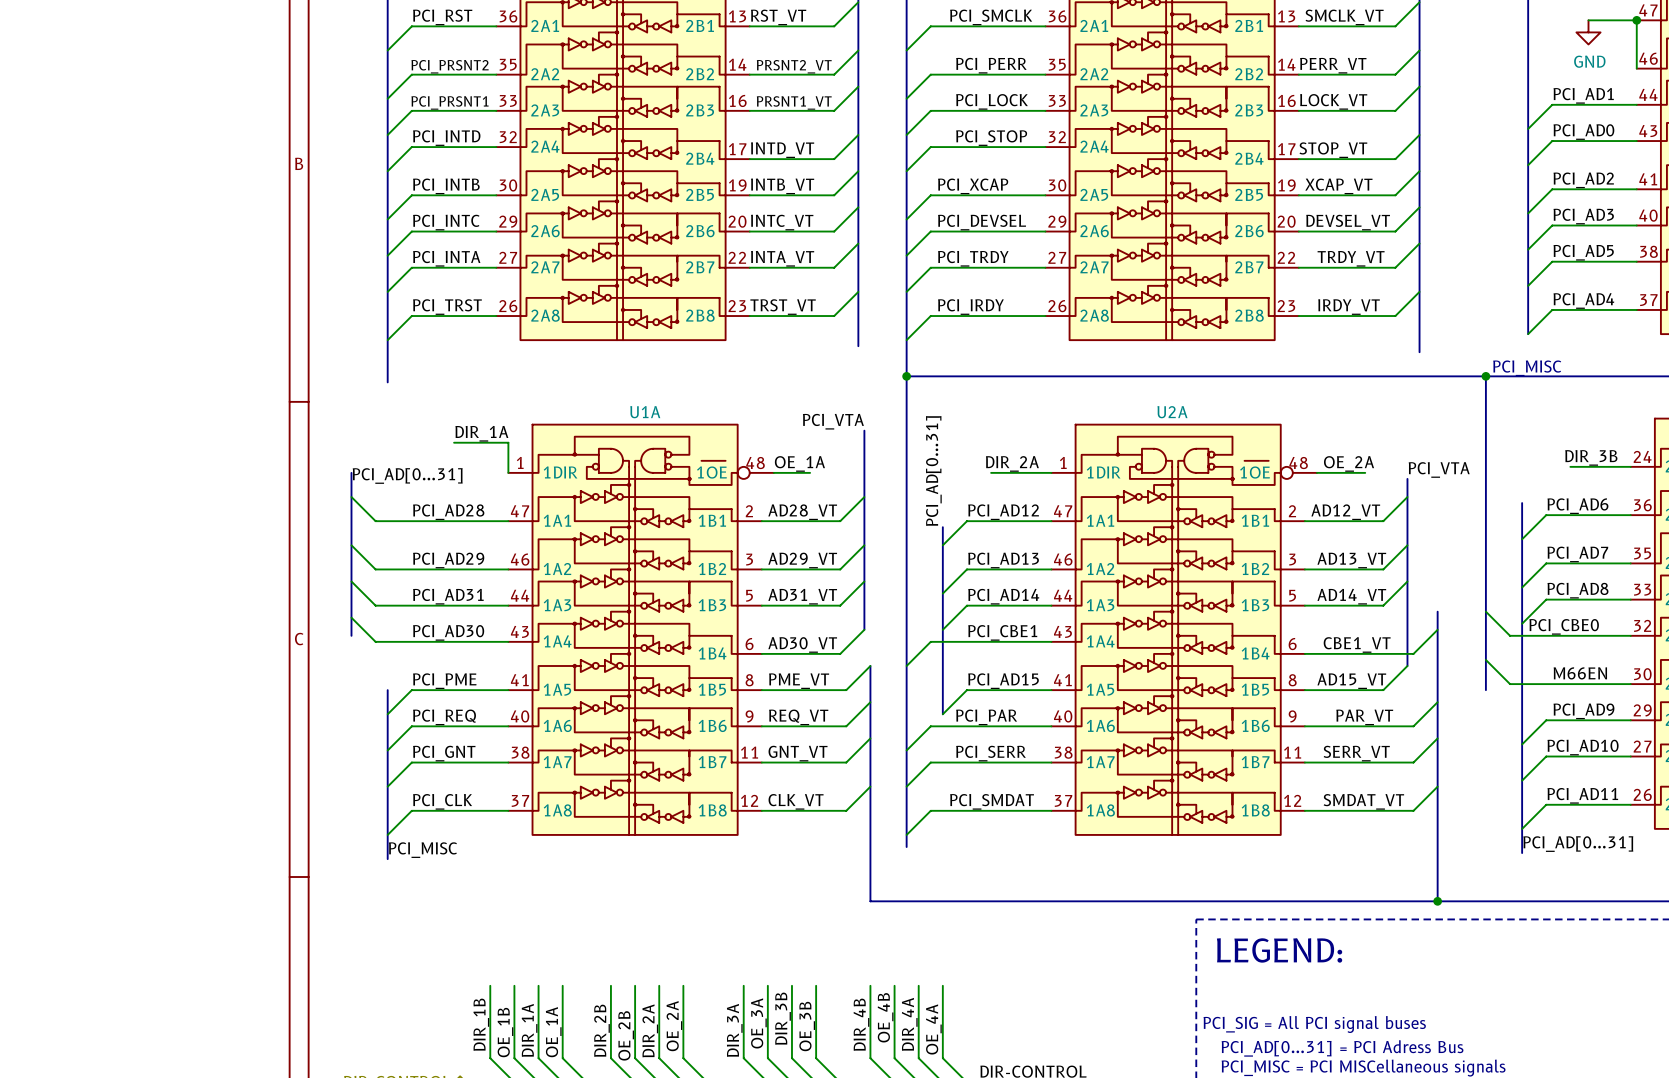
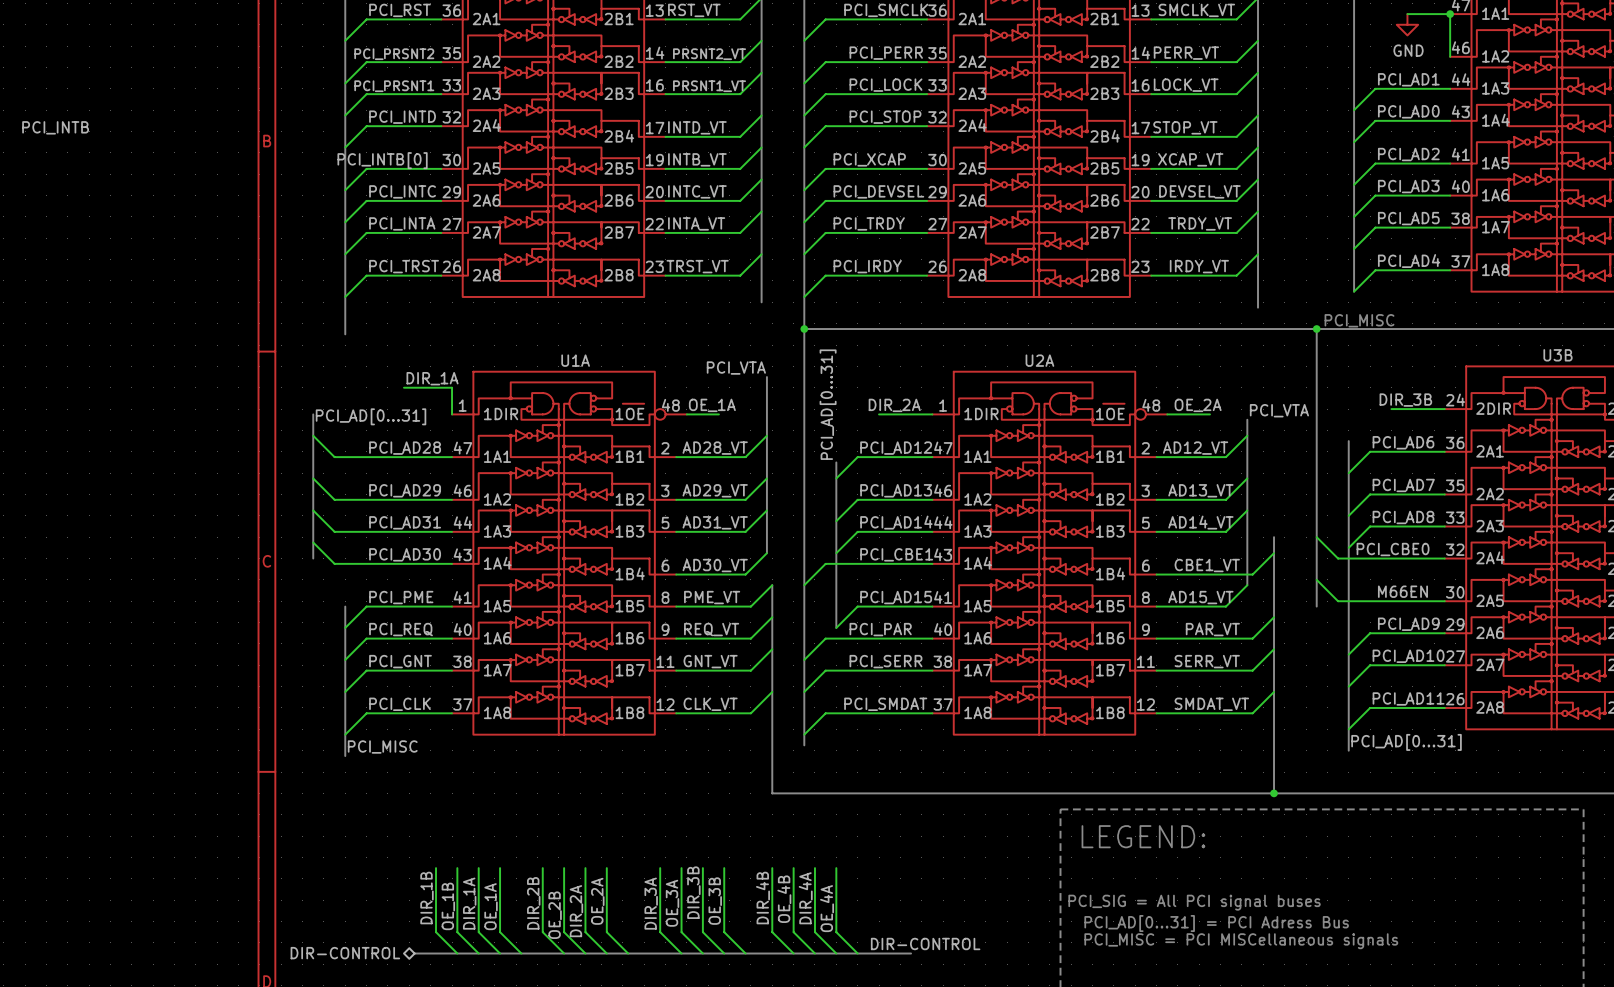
label: none -> PCI_INTB (55, 127)
label: PCI_INTB (446, 186) -> PCI_INTB[0] (382, 160)

